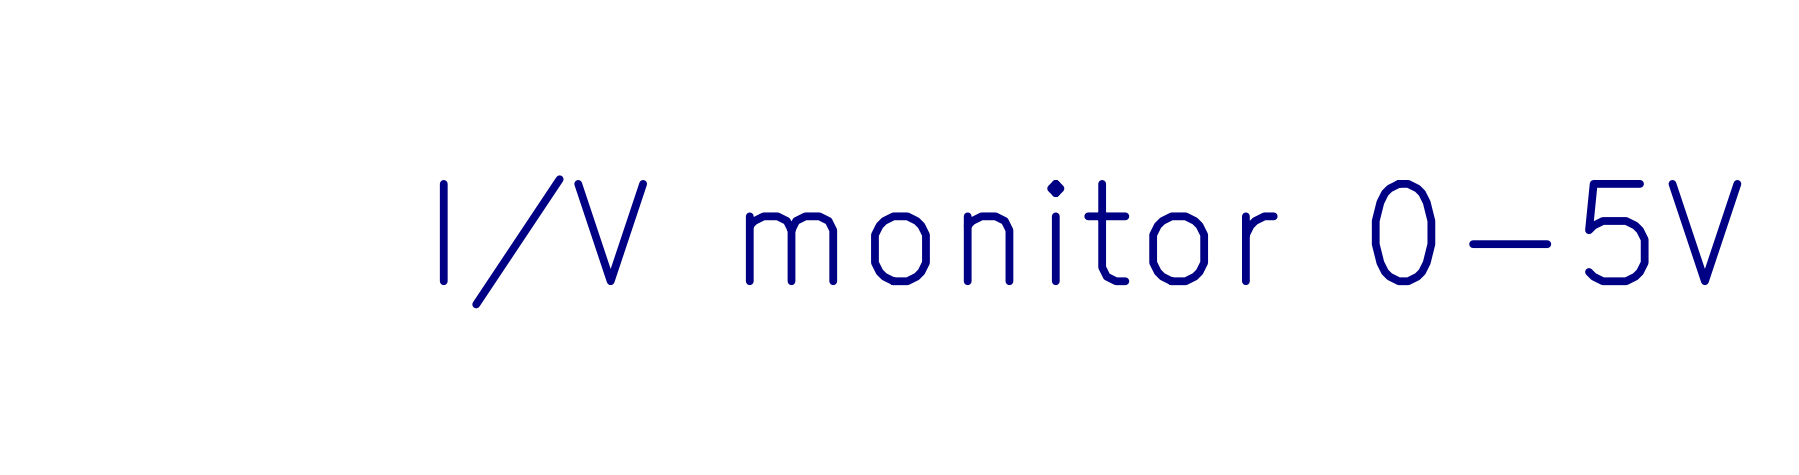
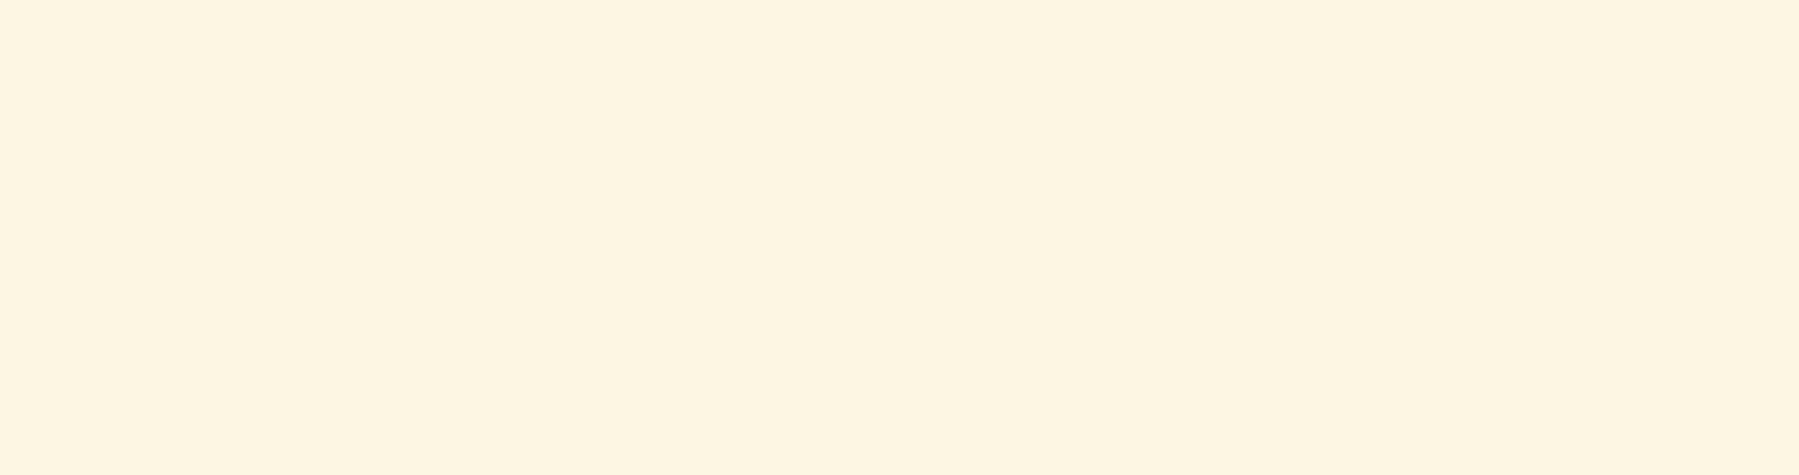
text: I/V monitor 0-5V (1090, 241) -> none

